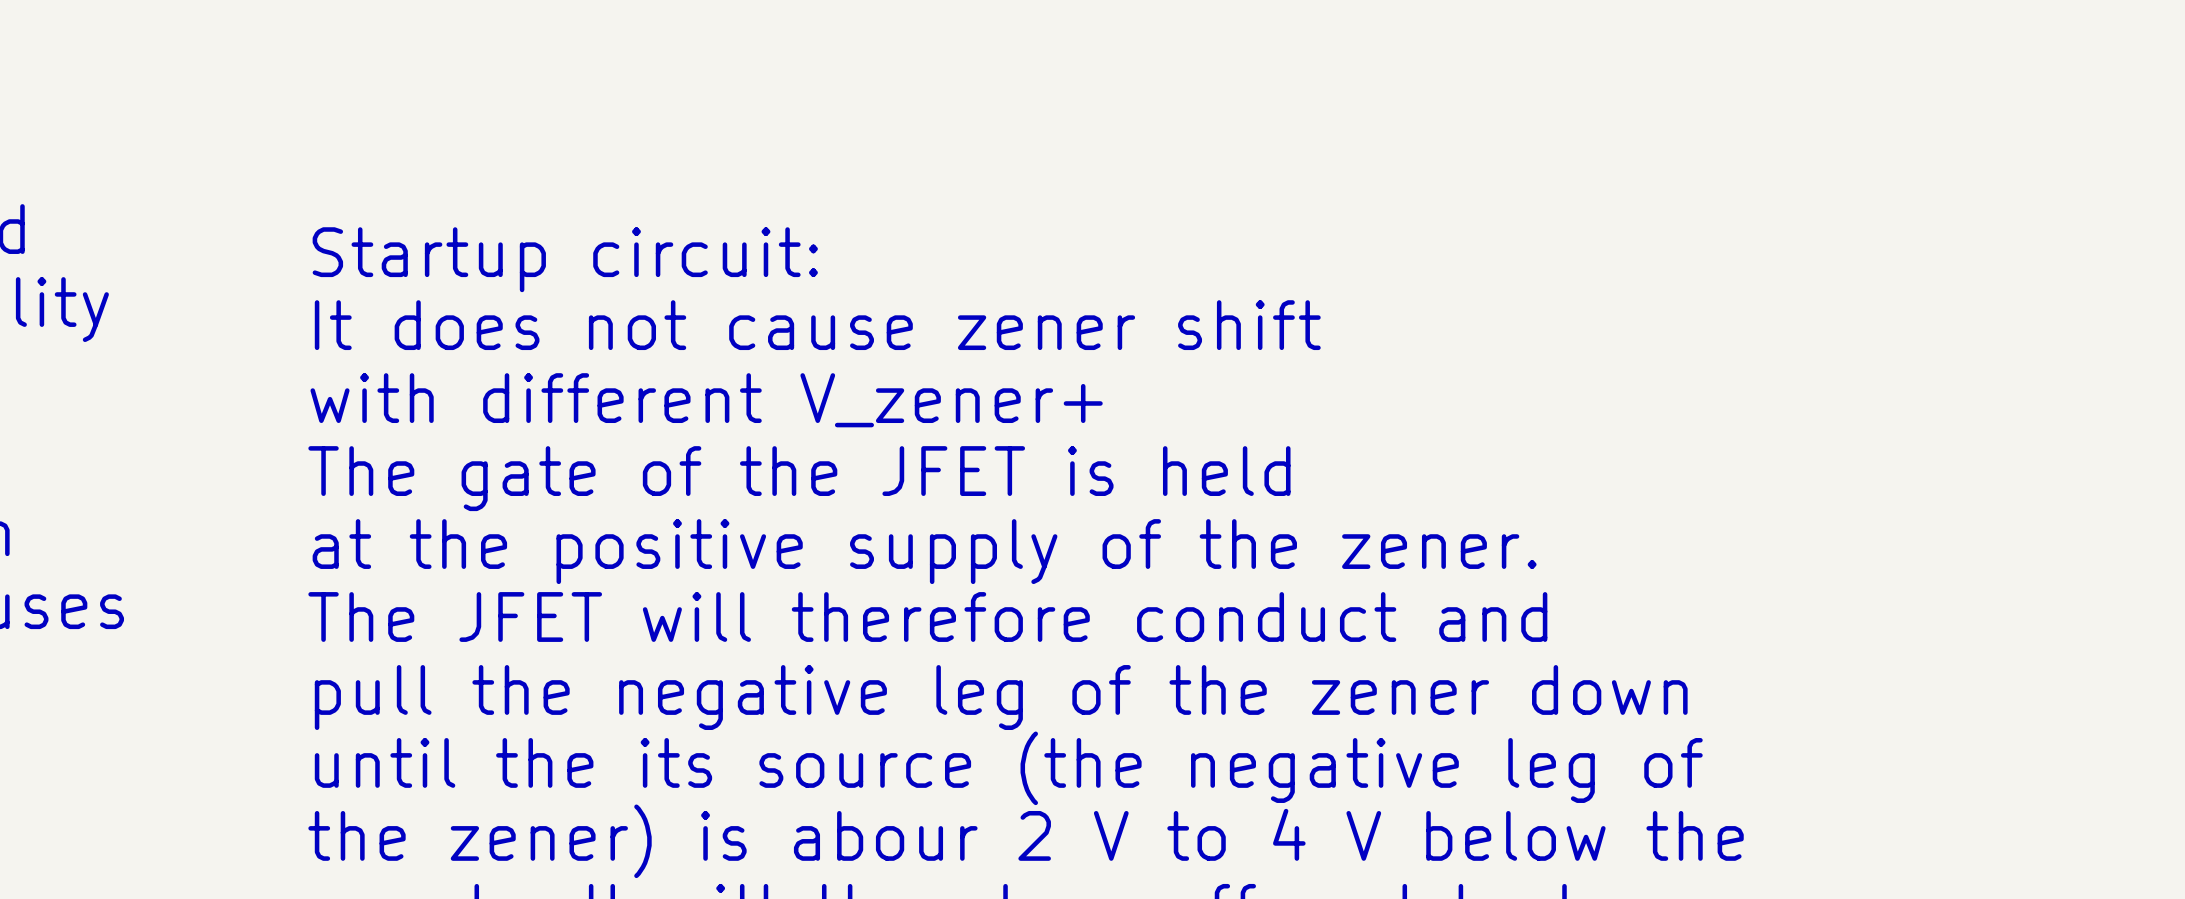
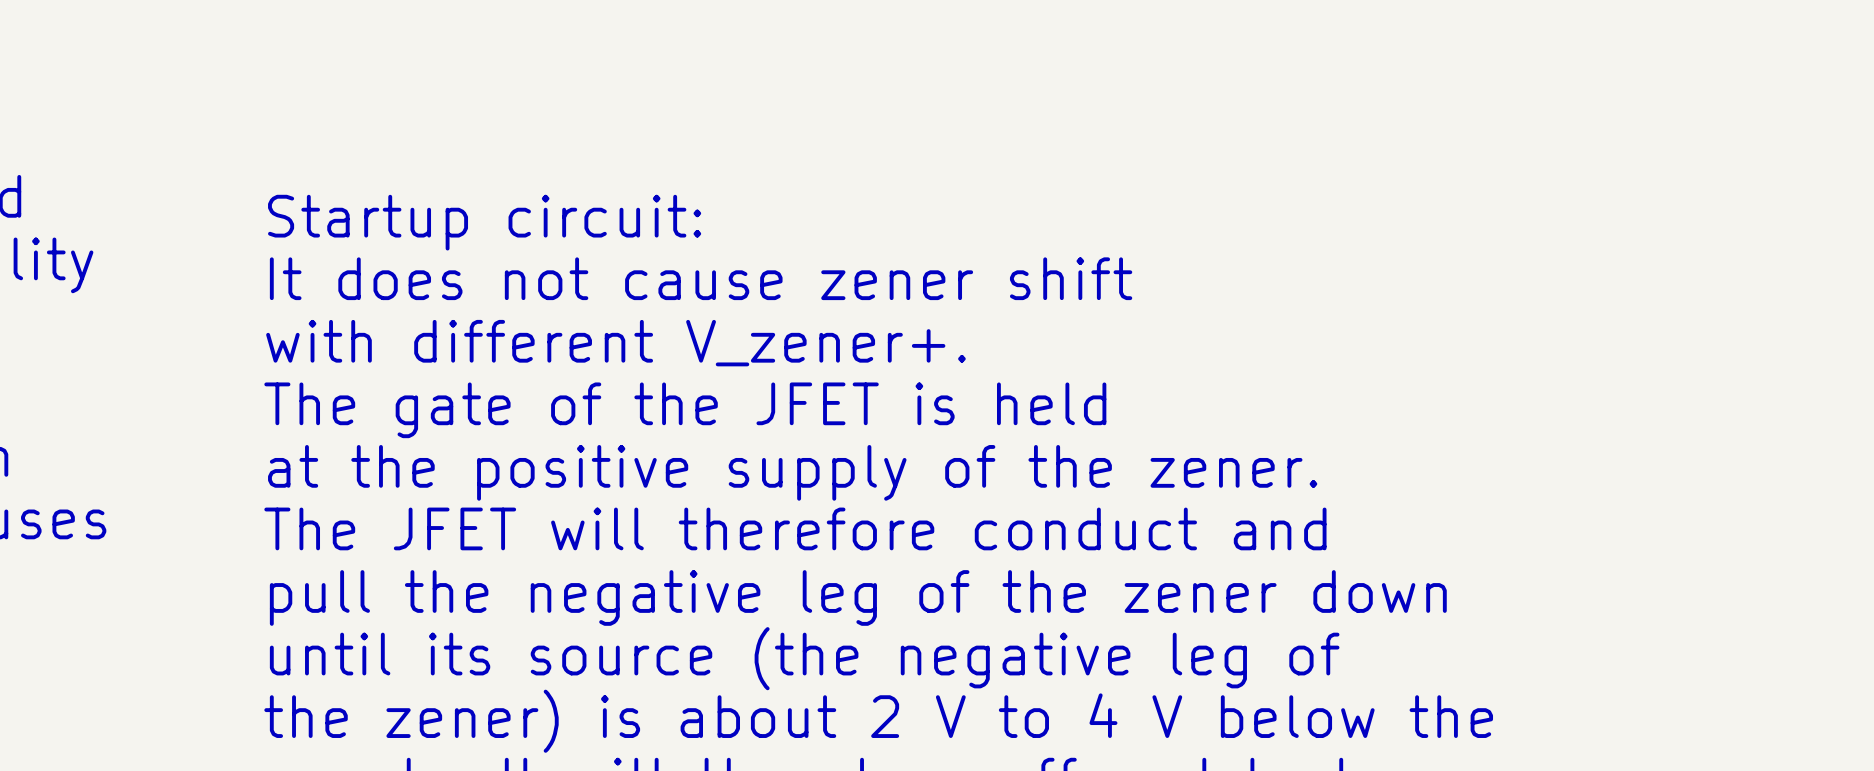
text: with different V_zener+ (706, 400) -> with different V_zener+. (615, 343)
text: until the its source (the negative leg of (1008, 768) -> until its source (the negative leg of (804, 658)
text: the zener) is abour 2 V to 4 V below the (1026, 841) -> the zener) is about 2 V to 4 V below the (878, 721)

